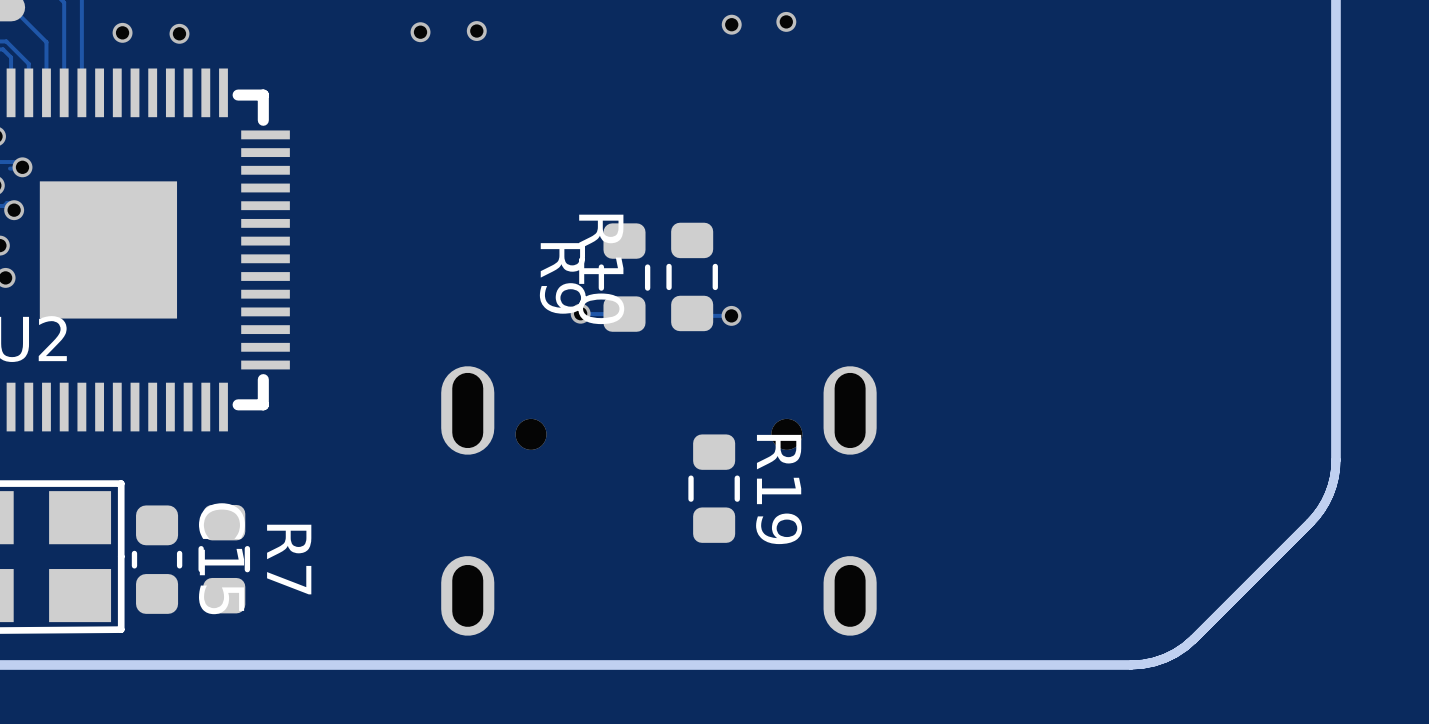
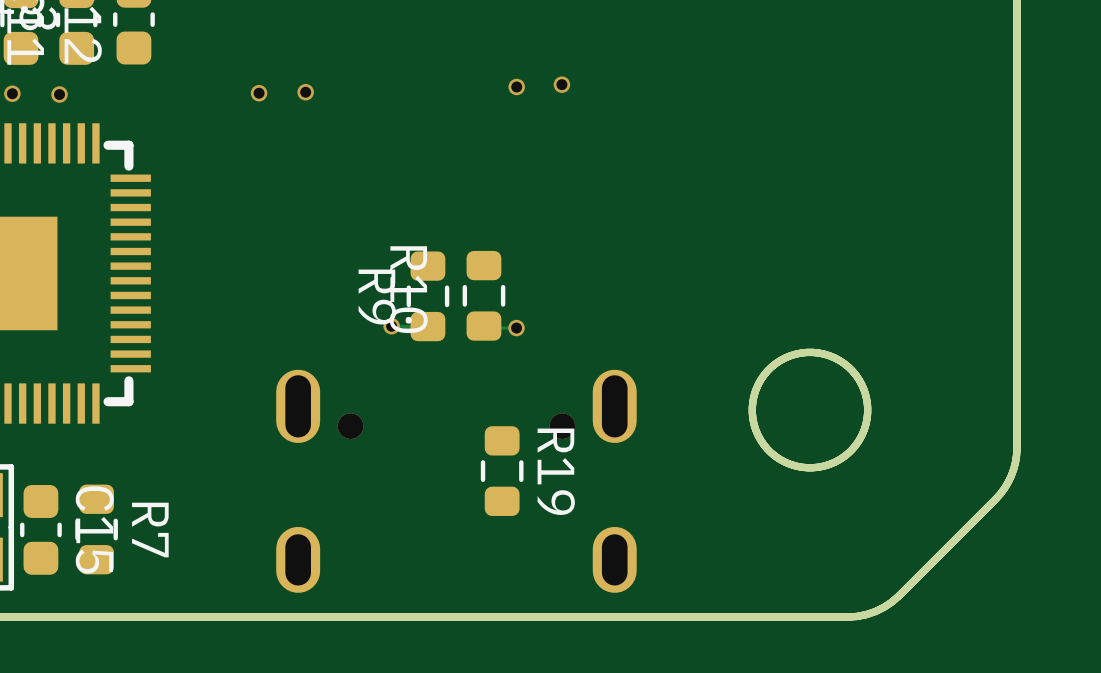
round board edge: none -> [748, 348, 872, 472]

